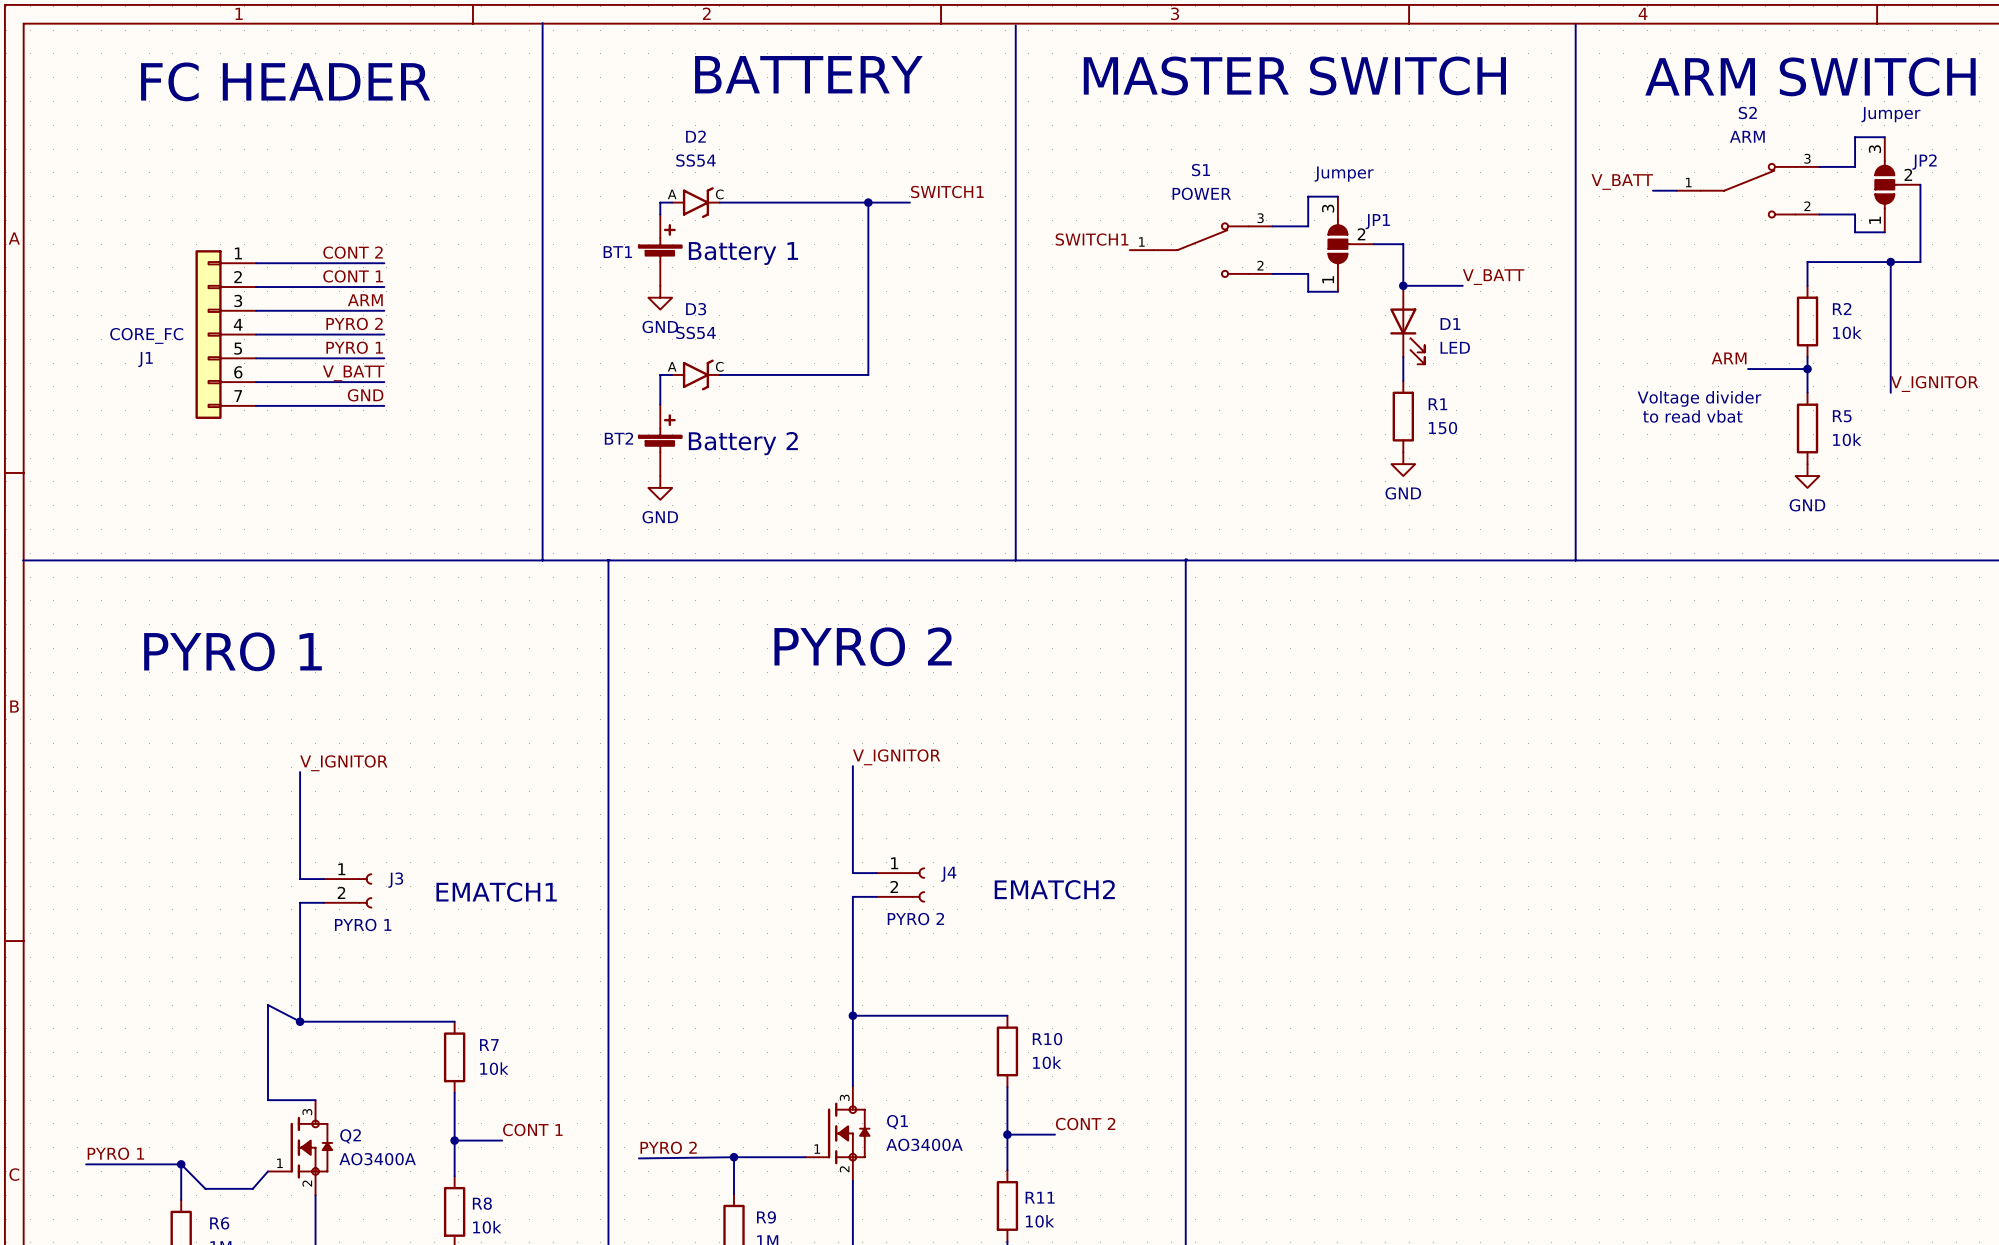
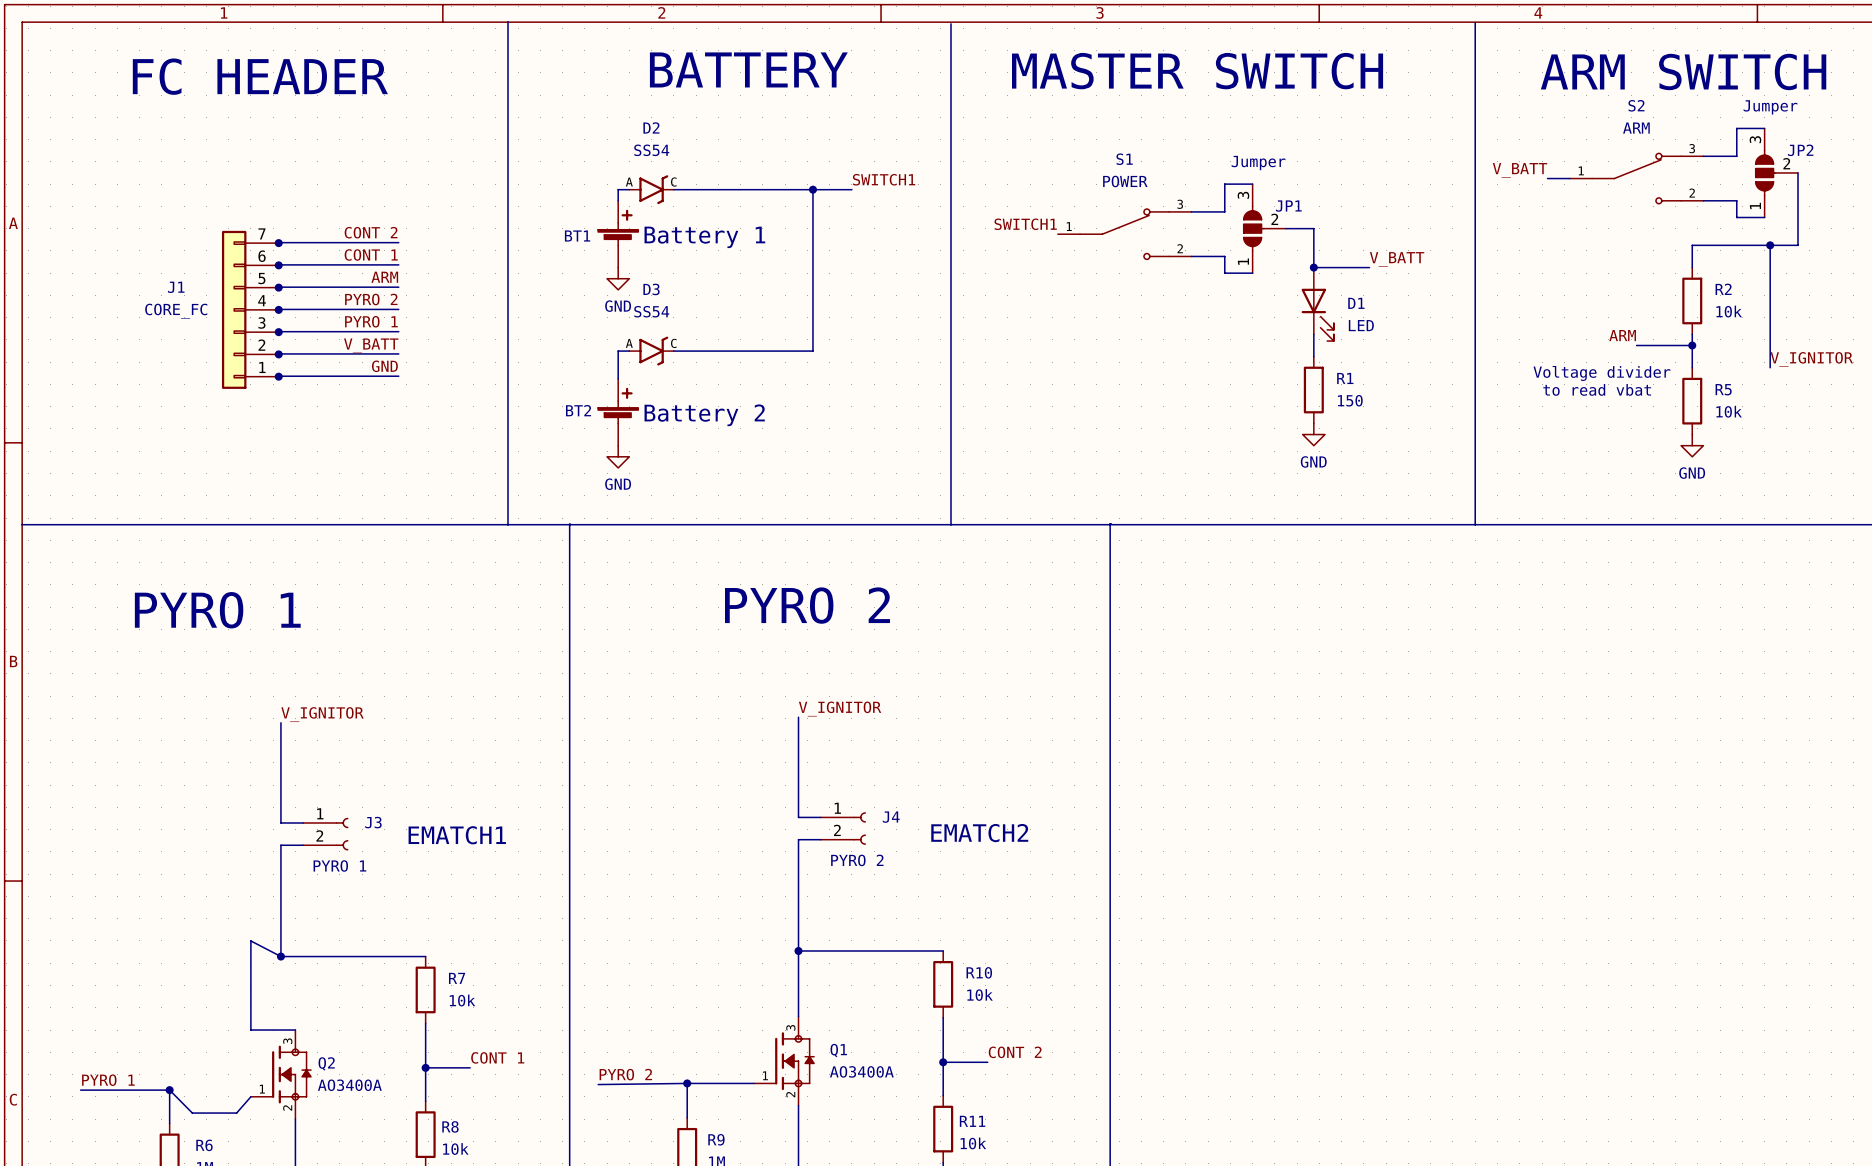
label position: CONT 2 (353, 252) -> CONT 2 (371, 232)
junction: none -> (278, 243)
wire: none -> (398, 242) (278, 243)
wire: (256, 263) (384, 263) -> none
label position: CONT 1 (353, 276) -> CONT 1 (371, 254)
wire: none -> (398, 264) (278, 265)
junction: none -> (278, 265)
wire: (256, 287) (384, 287) -> none
label position: ARM (365, 300) -> ARM (384, 277)
wire: none -> (398, 287) (278, 287)
junction: none -> (278, 287)
wire: (256, 310) (384, 310) -> none
label position: PYRO 2 (354, 323) -> PYRO 2 (371, 299)
junction: none -> (278, 309)
wire: none -> (398, 309) (278, 309)
J1 flip: as is (208, 334) -> up-down (234, 309)
wire: (256, 334) (384, 334) -> none
label position: PYRO 1 (354, 347) -> PYRO 1 (371, 321)
junction: none -> (278, 332)
wire: none -> (398, 331) (278, 332)
wire: (256, 358) (384, 358) -> none
label position: V_BATT (353, 373) -> V_BATT (371, 345)
junction: none -> (278, 354)
wire: none -> (398, 353) (278, 354)
wire: (256, 382) (384, 382) -> none
label position: GND (365, 395) -> GND (384, 366)
wire: none -> (398, 376) (278, 376)
junction: none -> (278, 376)
wire: (256, 405) (384, 405) -> none

